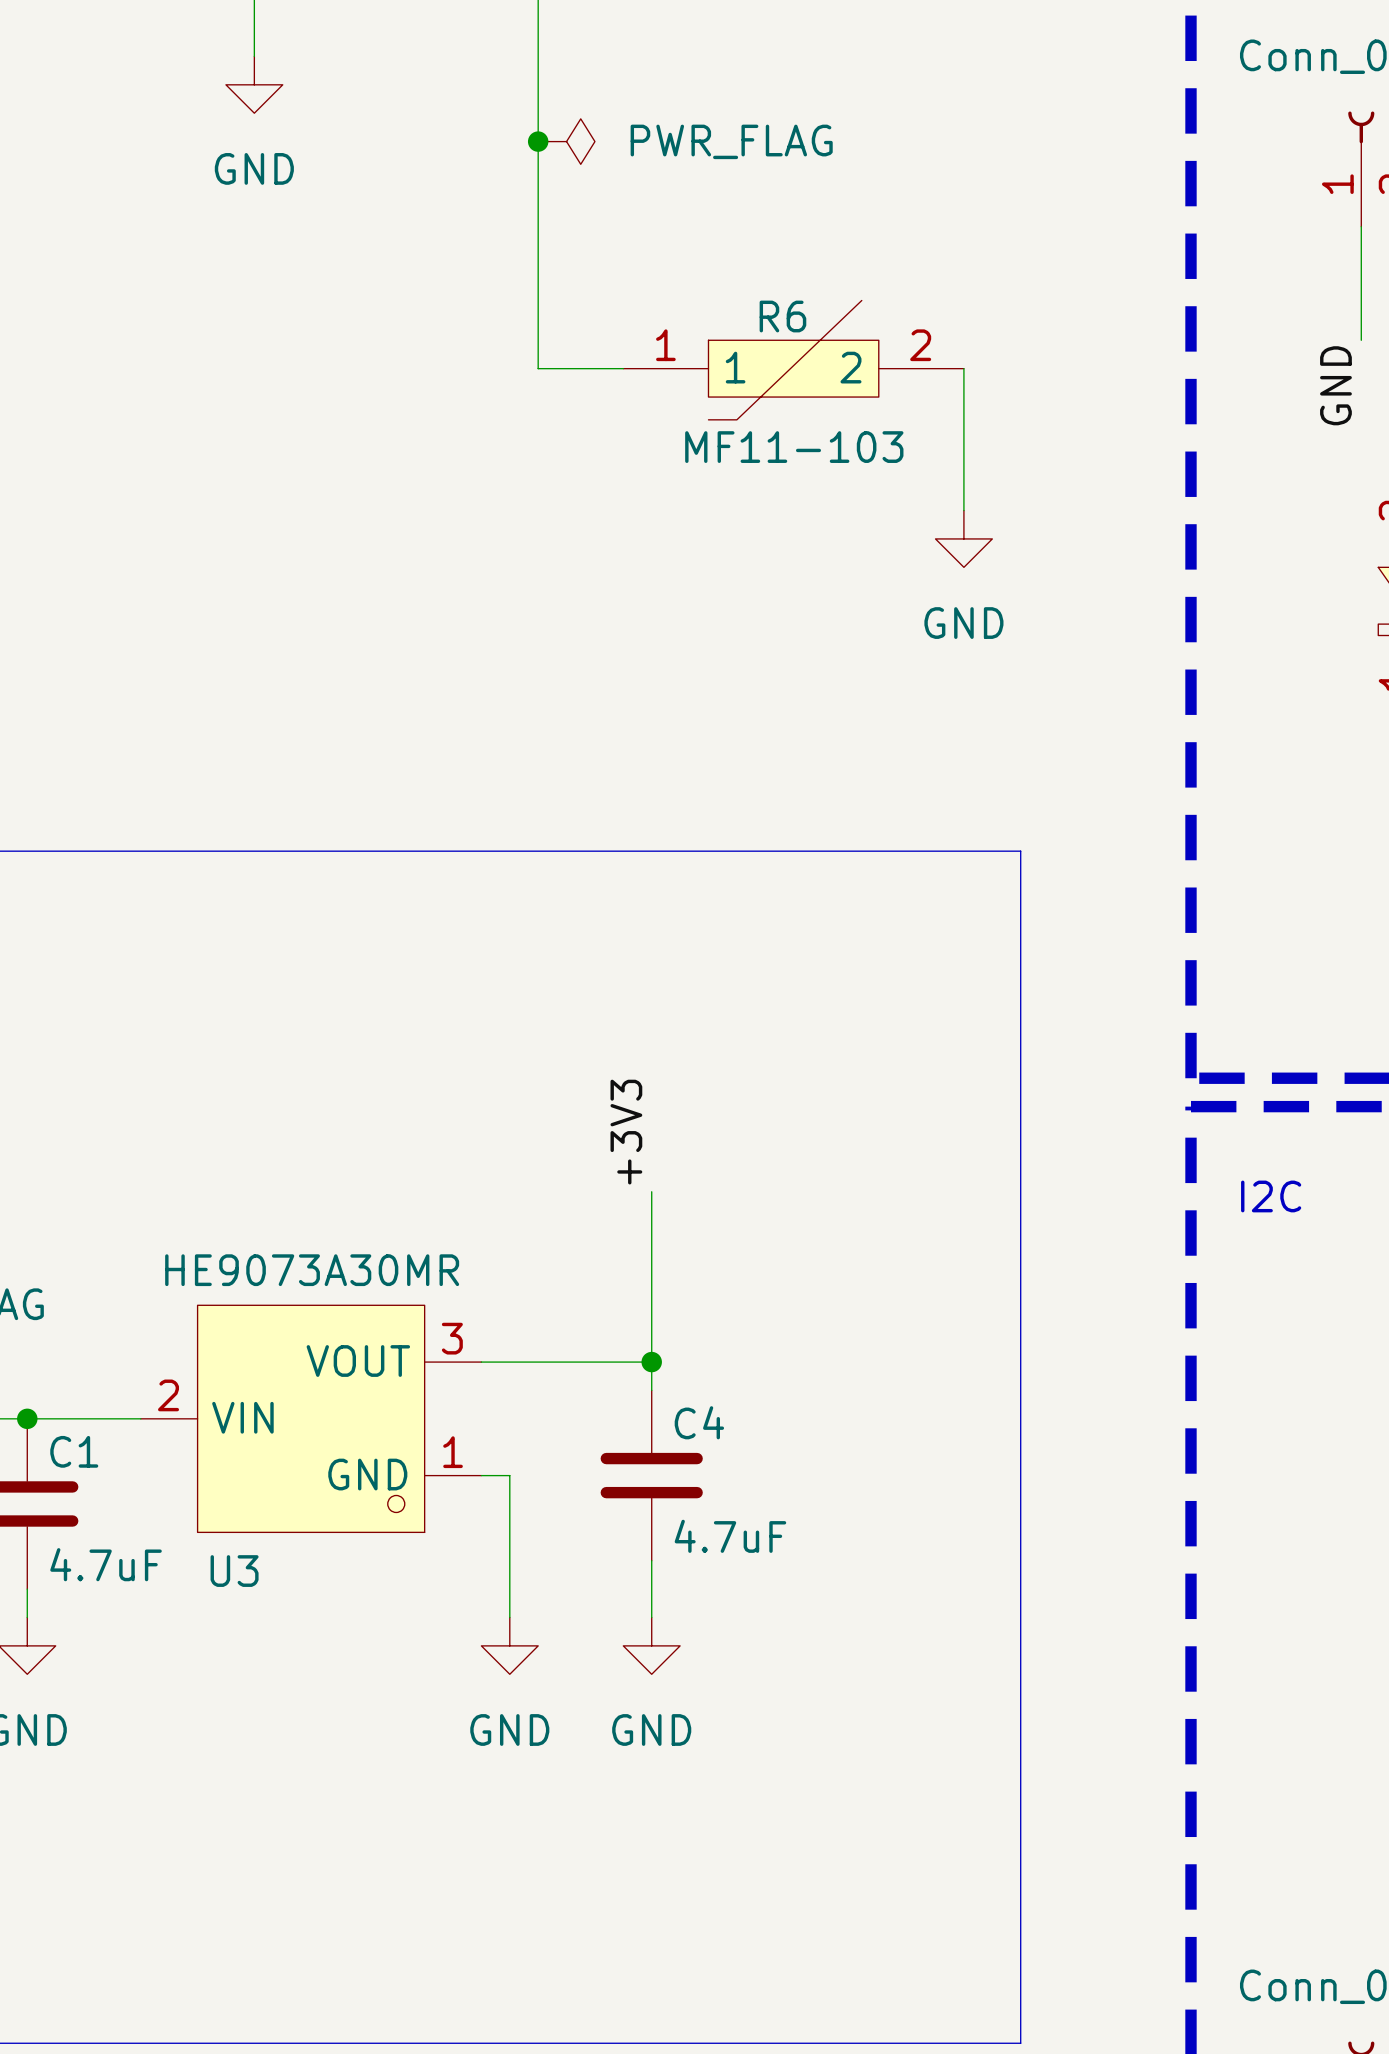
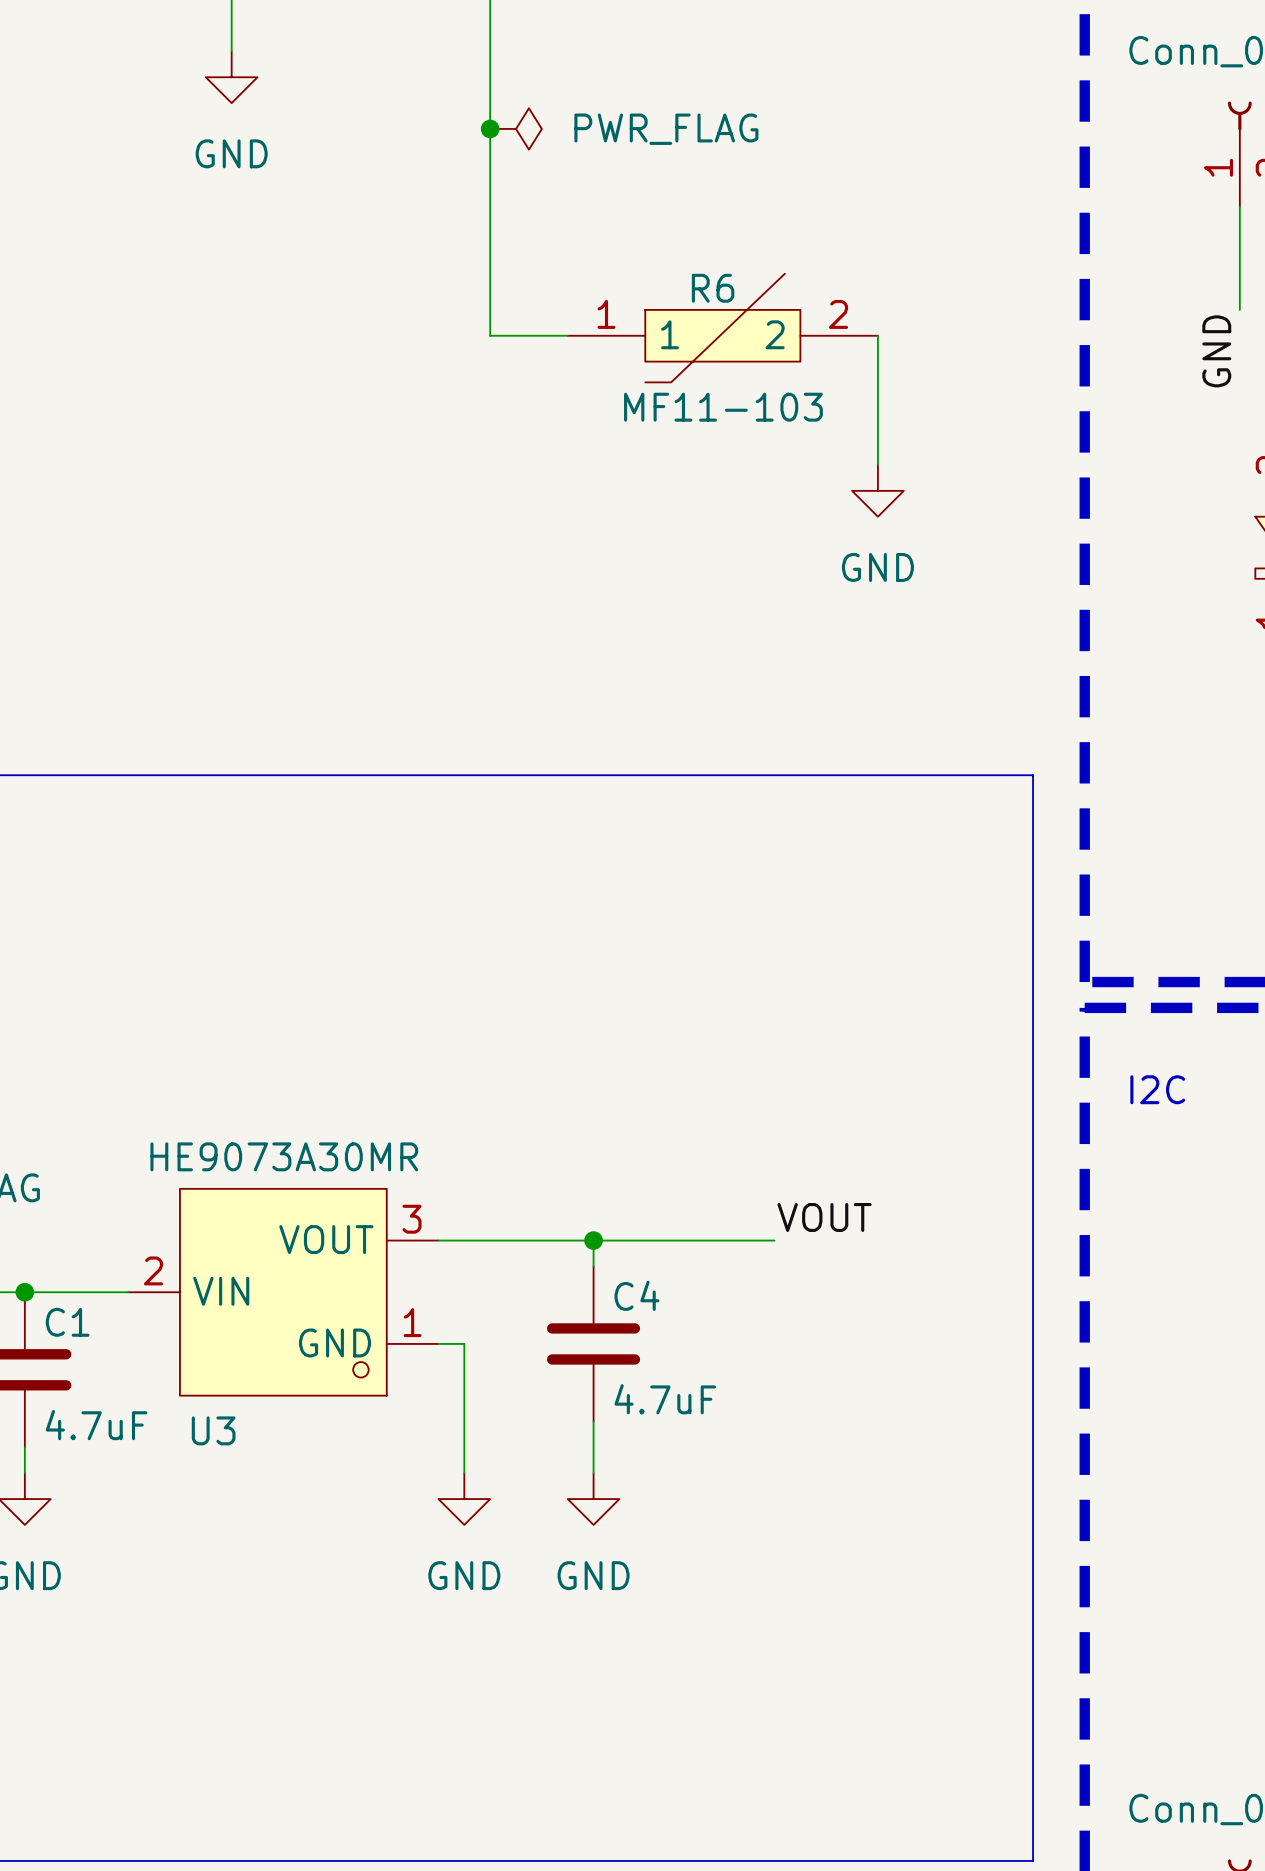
line: (1020, 851) (1020, 2043) -> (929, 775) (1033, 775) (1033, 1860) (929, 1860)
label: +3V3 (626, 1132) -> none
wire: (651, 1191) (651, 1362) -> (774, 1240) (593, 1240)
label: none -> VOUT (824, 1217)

